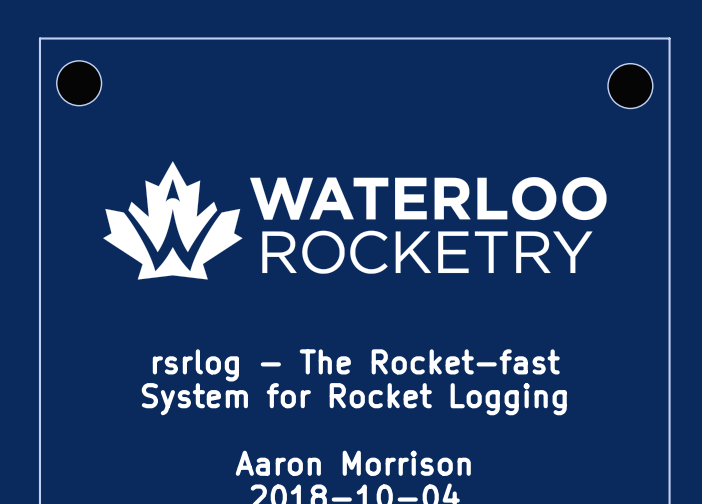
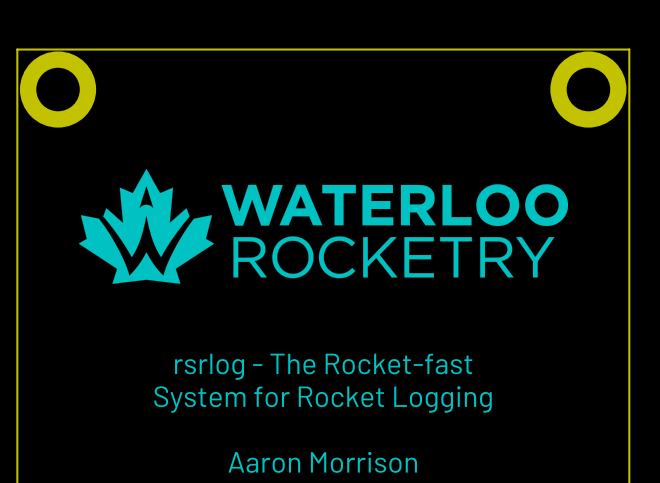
part footprint: [56, 60, 102, 106] -> [19, 51, 97, 128]
part footprint: [608, 63, 653, 109] -> [550, 51, 627, 128]

